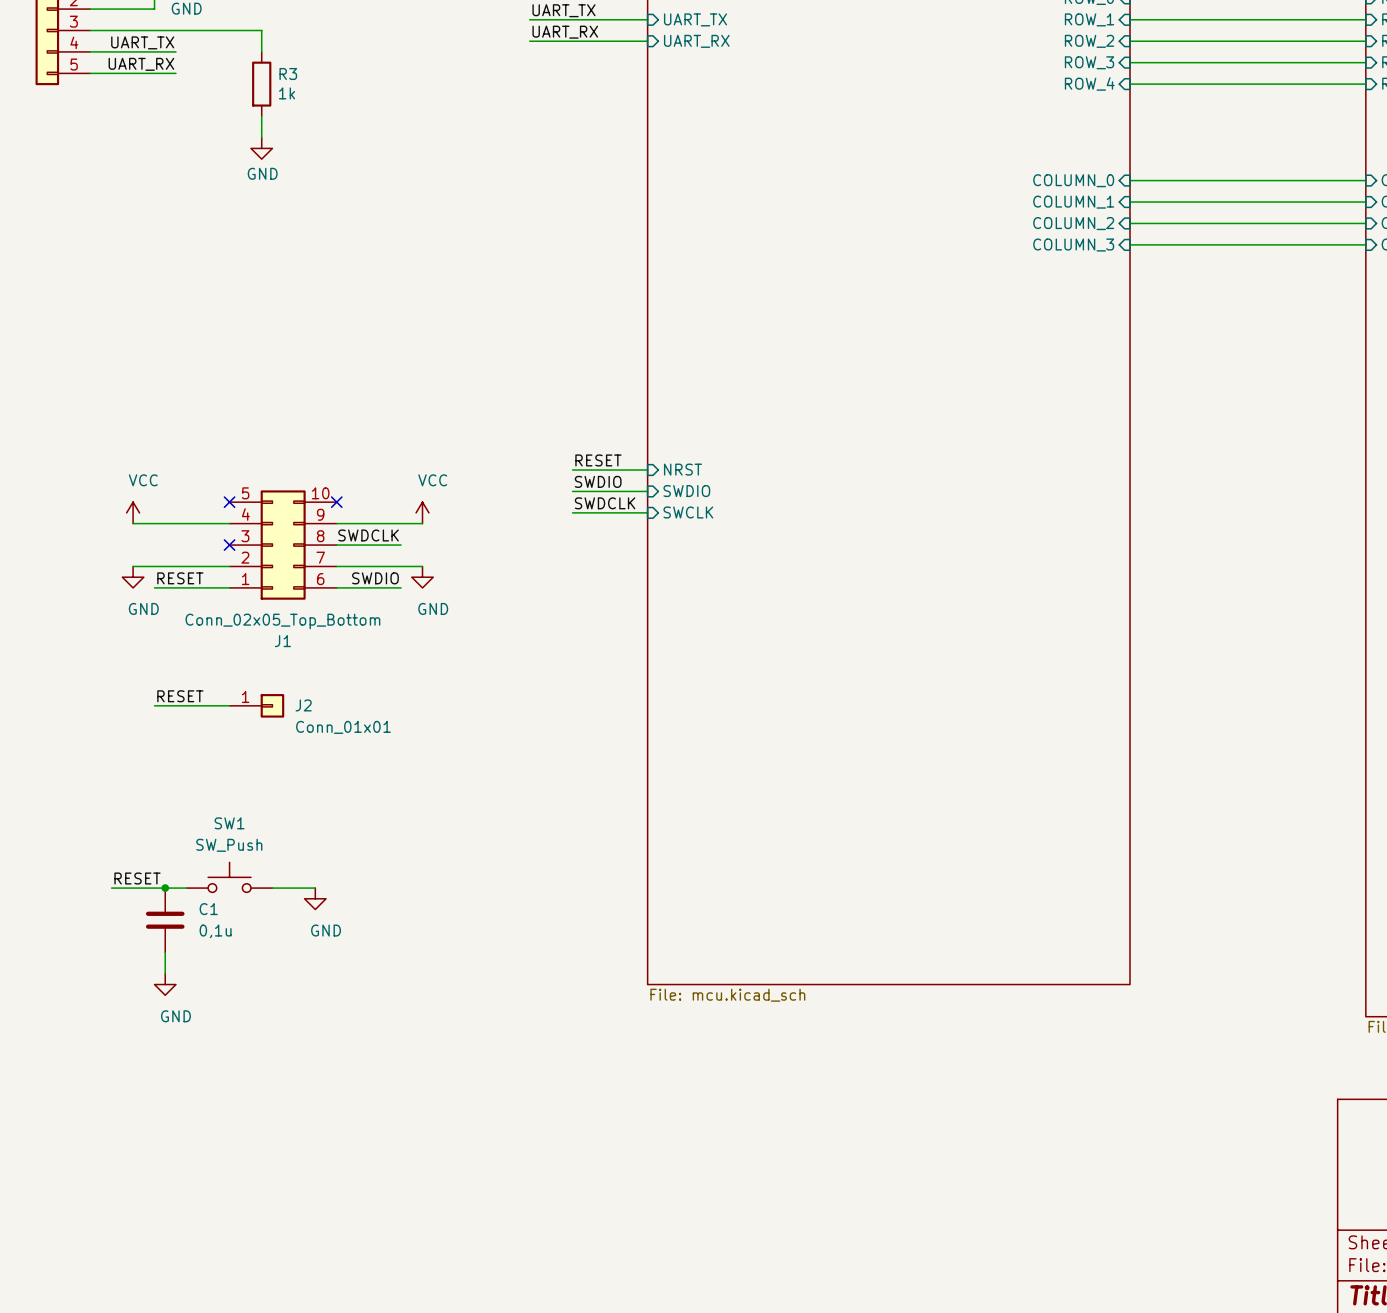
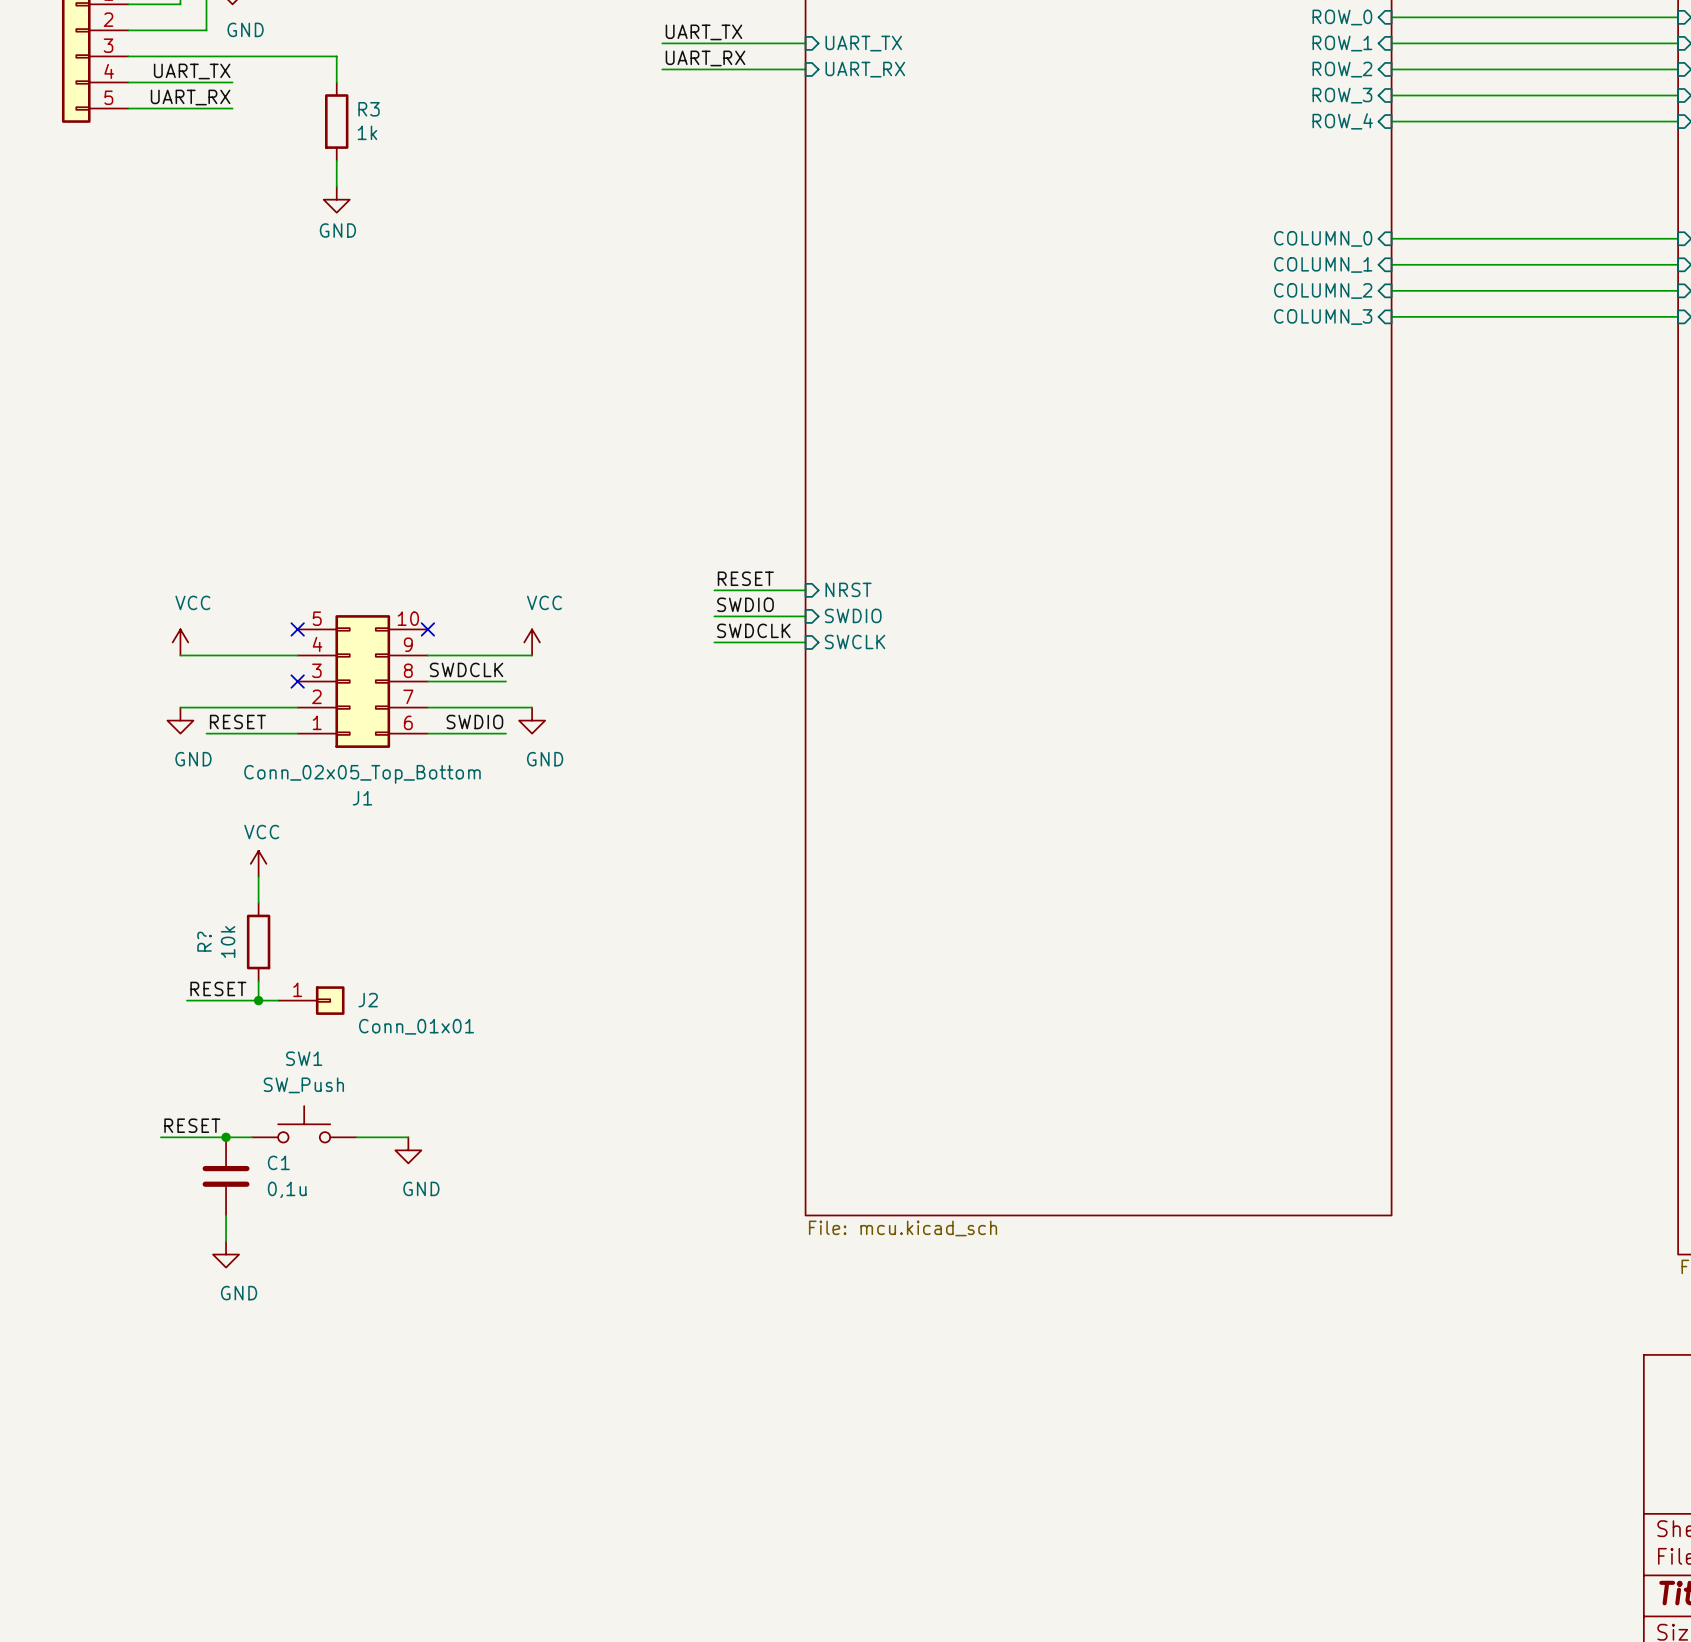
power symbol: none -> VCC (258, 863)
label: RESET (180, 696) -> none
wire: (154, 705) (229, 705) -> (186, 1000) (278, 1000)
wire: none -> (258, 876) (258, 902)
J2 position: (256, 705) -> (311, 1000)
R?: none -> 10k (258, 941)
wire: none -> (258, 981) (258, 1000)
label: none -> RESET (218, 988)
junction: none -> (258, 1000)
SW1 position: (229, 877) -> (304, 1124)
label position: RESET (137, 878) -> RESET (192, 1125)
wire: (111, 888) (186, 888) -> (160, 1137) (252, 1137)
junction position: (165, 888) -> (226, 1137)
wire: (272, 888) (315, 888) -> (356, 1137) (408, 1137)
power symbol position: GND (315, 898) -> GND (408, 1150)
C1 position: (165, 920) -> (226, 1176)
wire: (165, 952) (165, 973) -> (226, 1215) (226, 1241)
power symbol position: GND (165, 984) -> GND (226, 1254)

